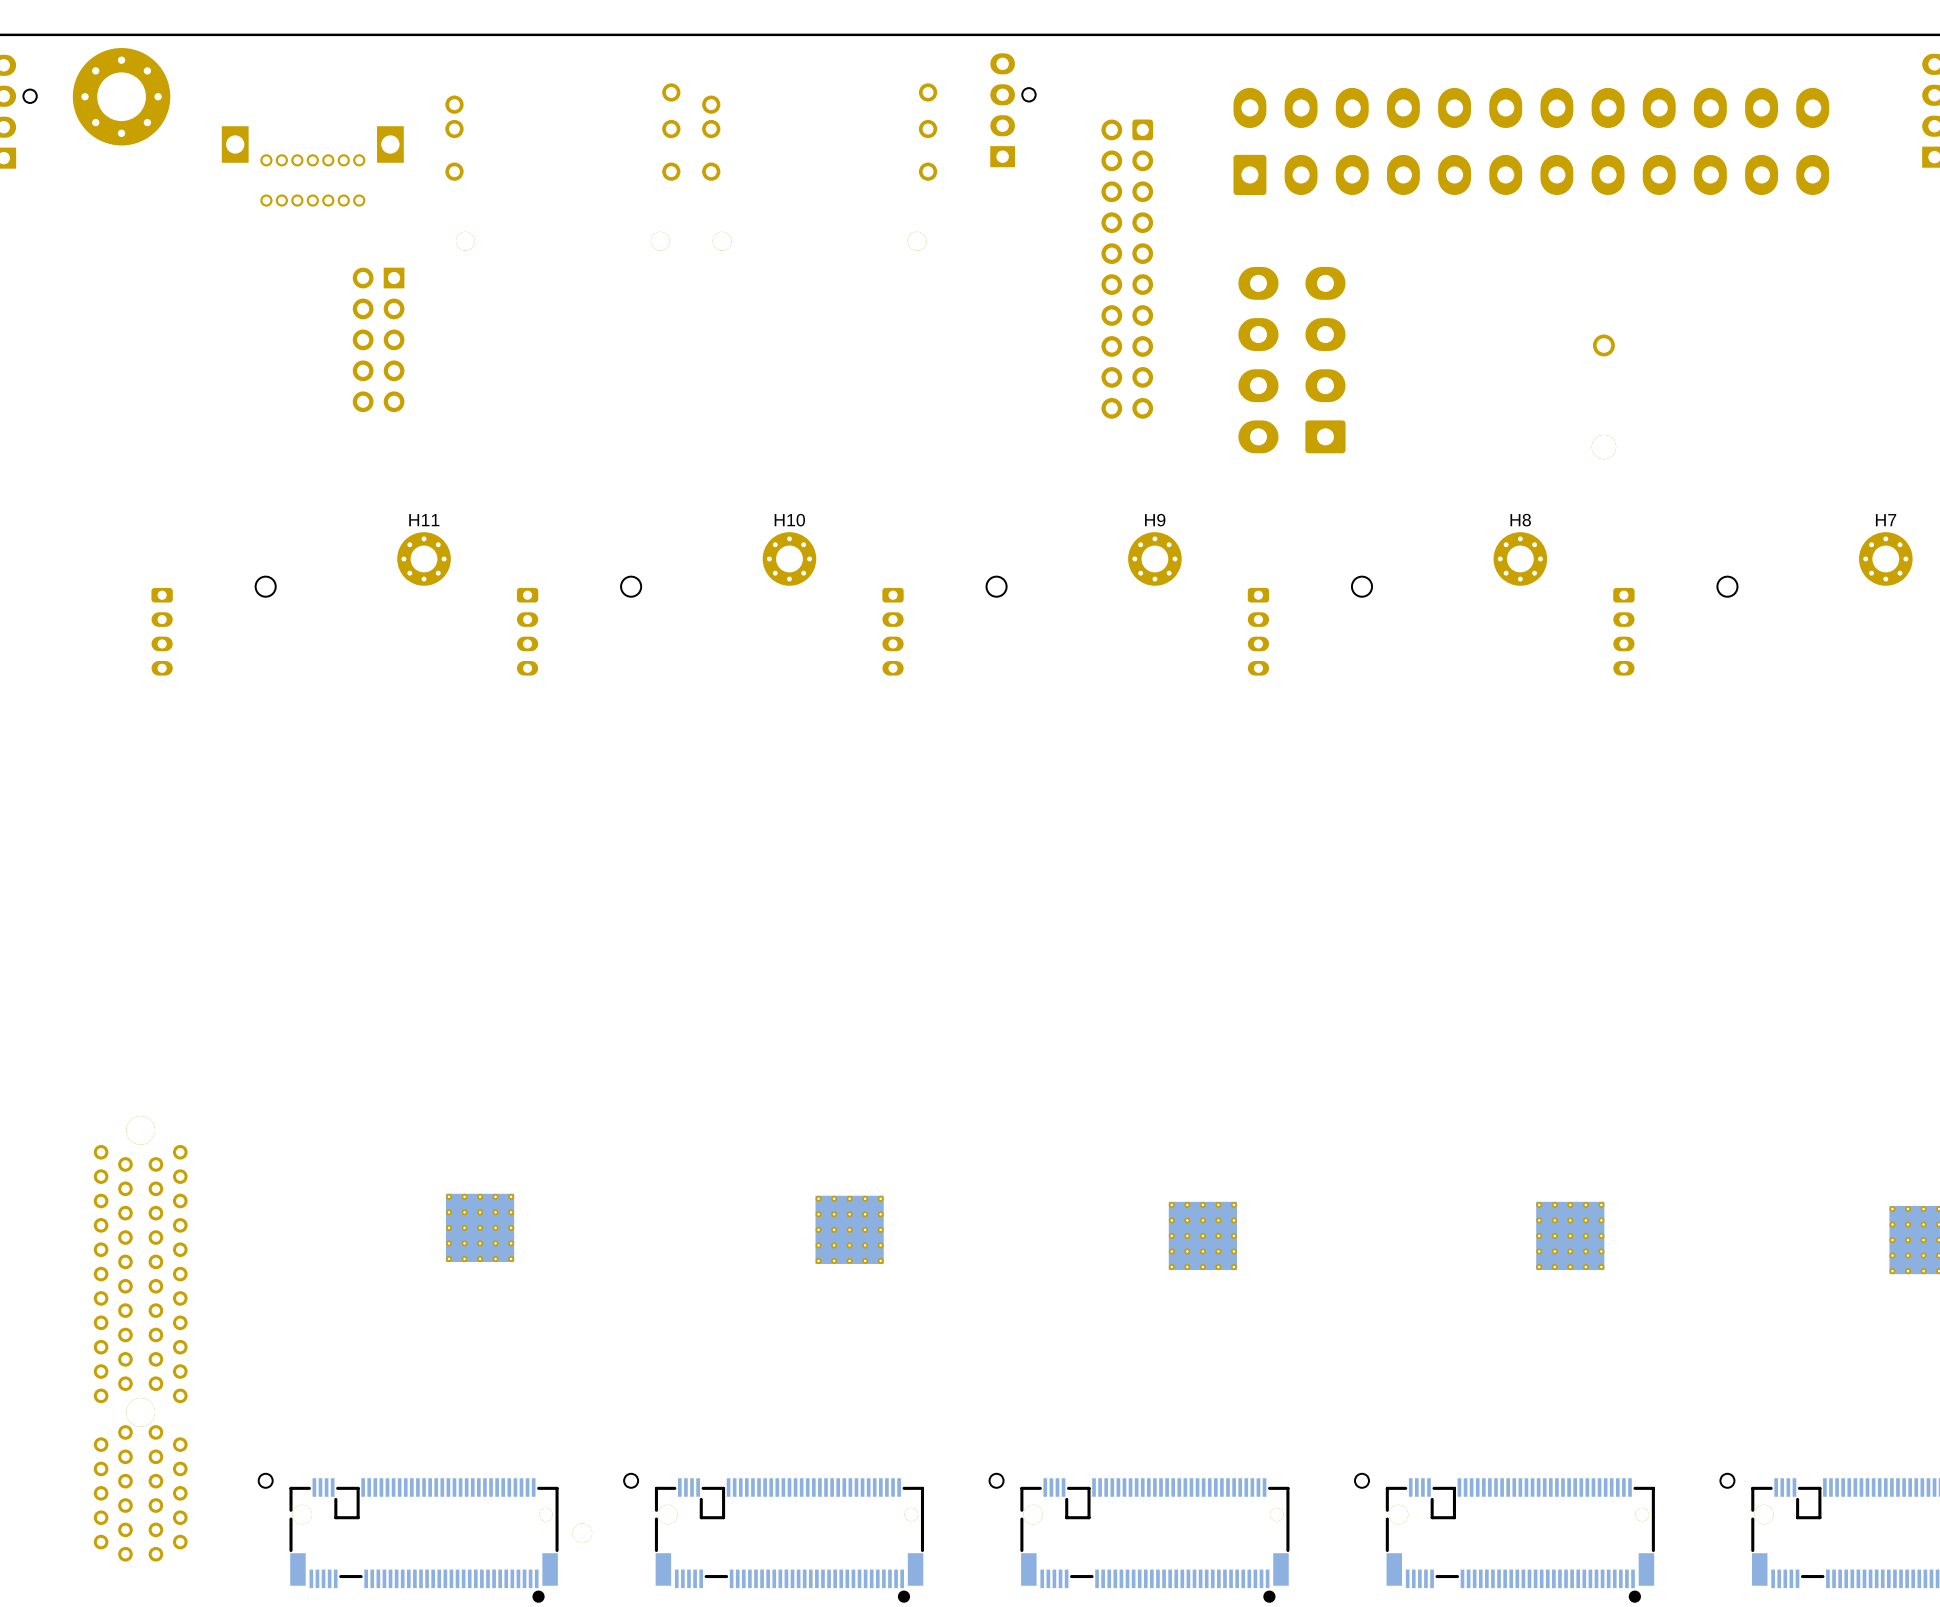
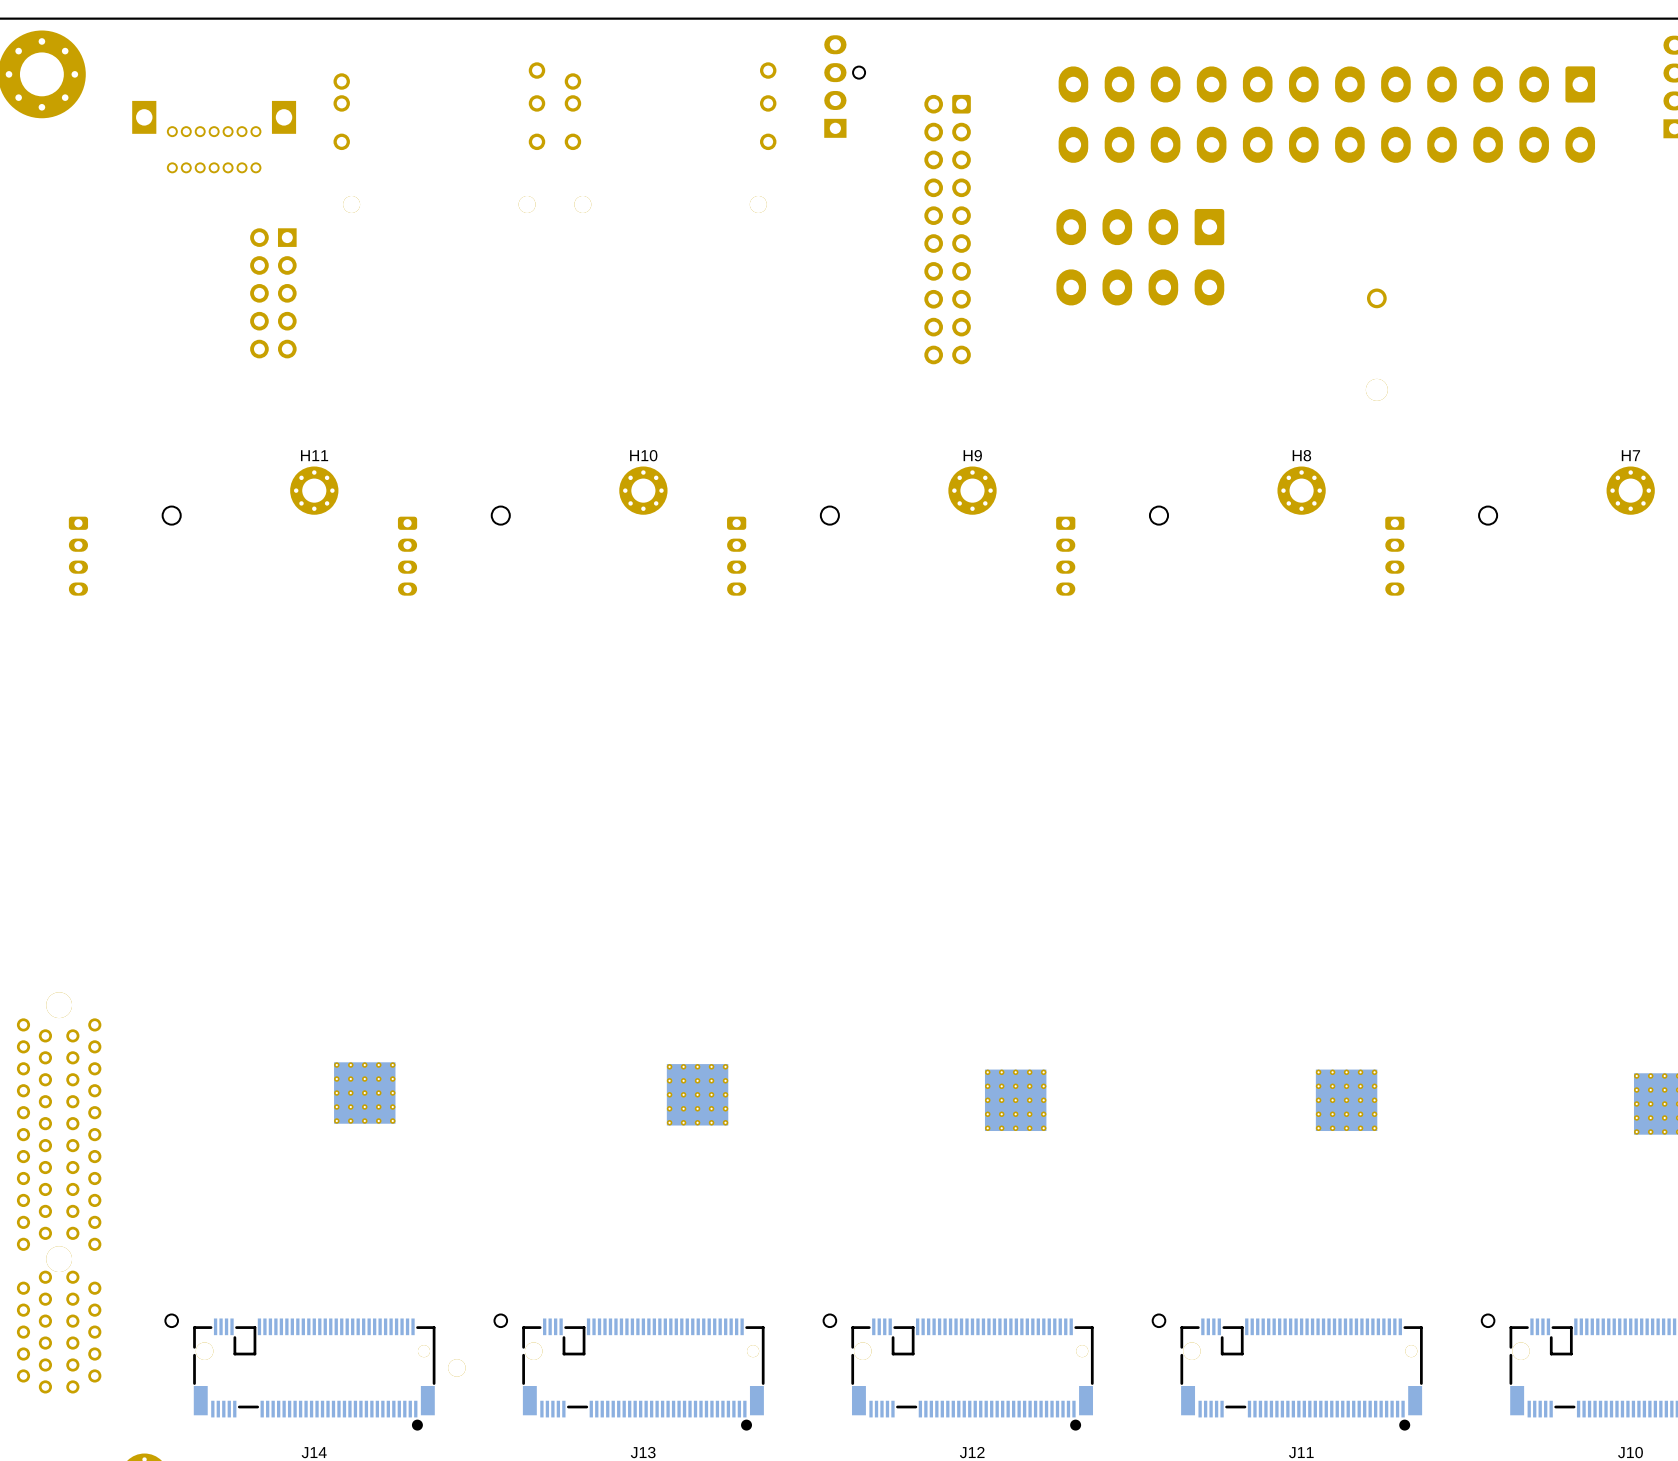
part rotation: 0° (1531, 141) -> 180° (1326, 114)
part rotation: 0° (1291, 360) -> 90° counterclockwise (1140, 257)

